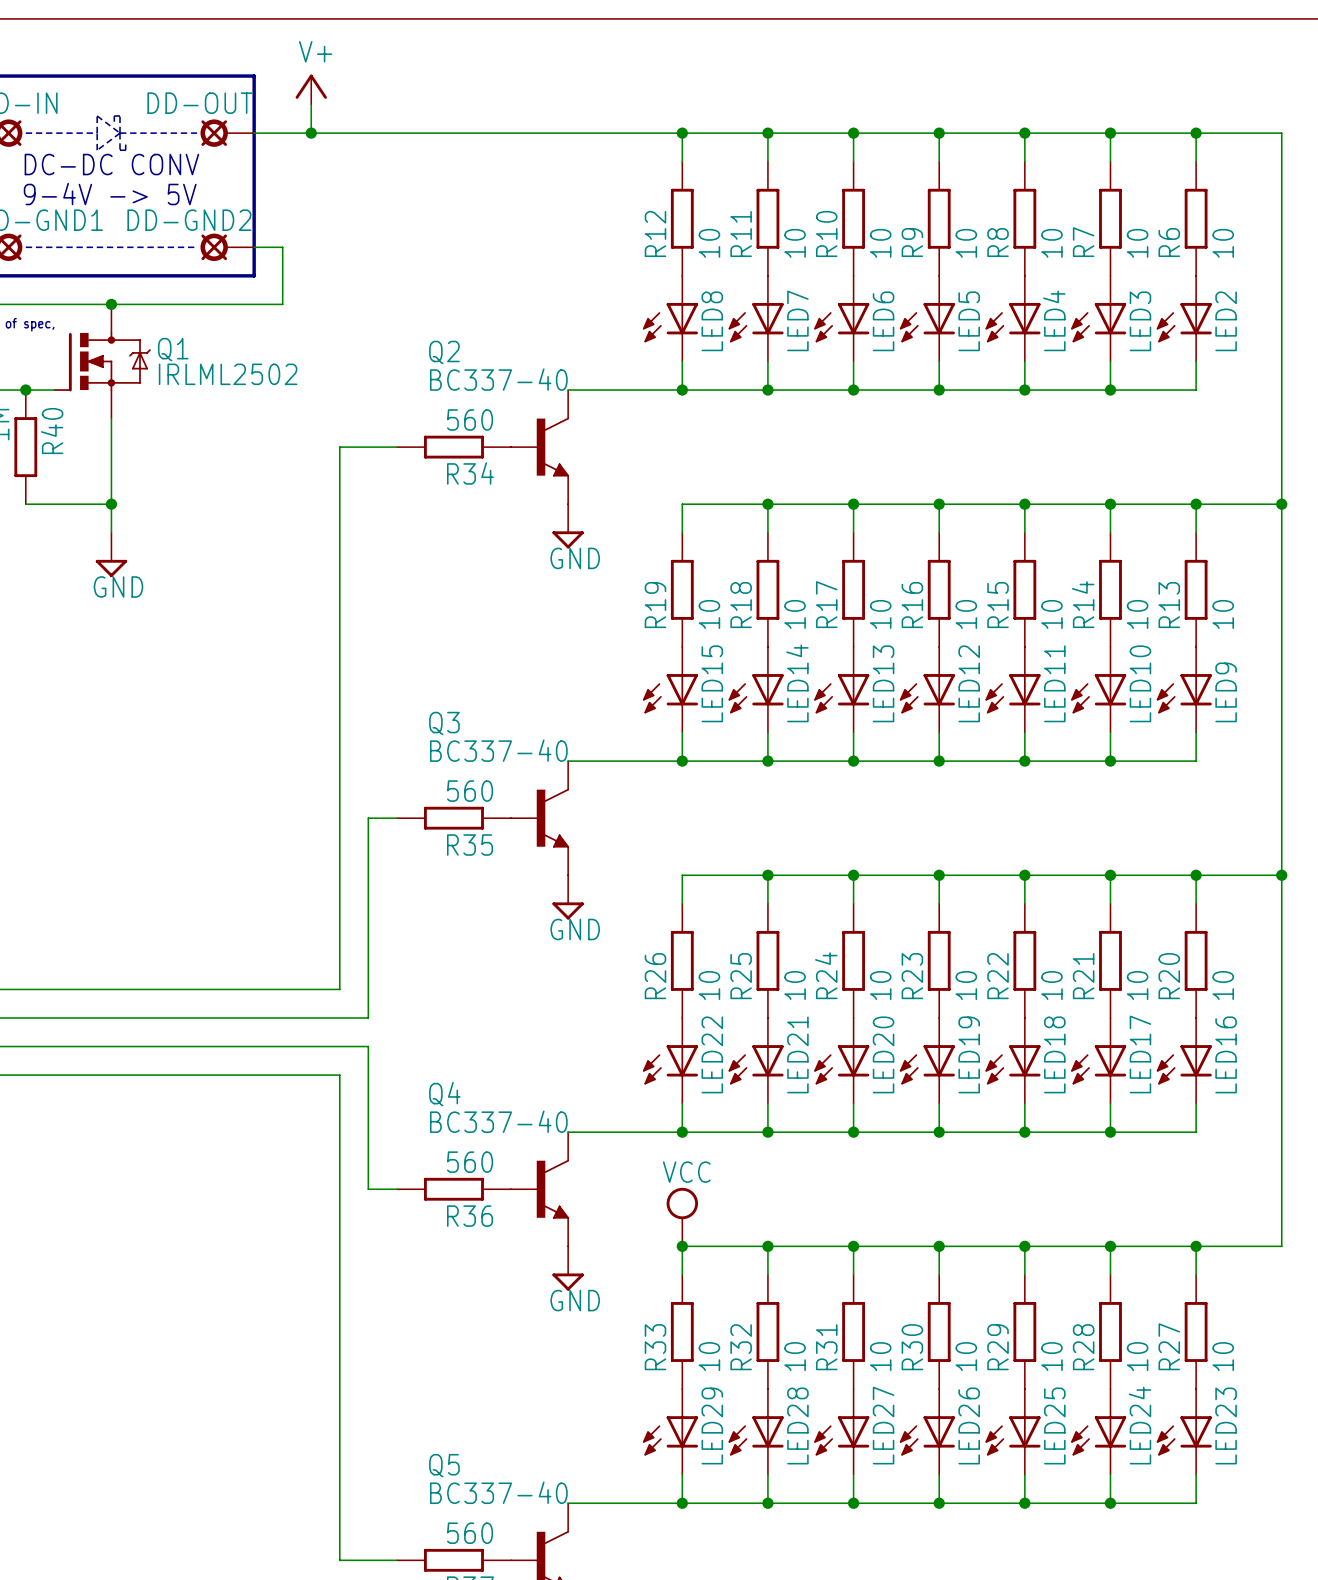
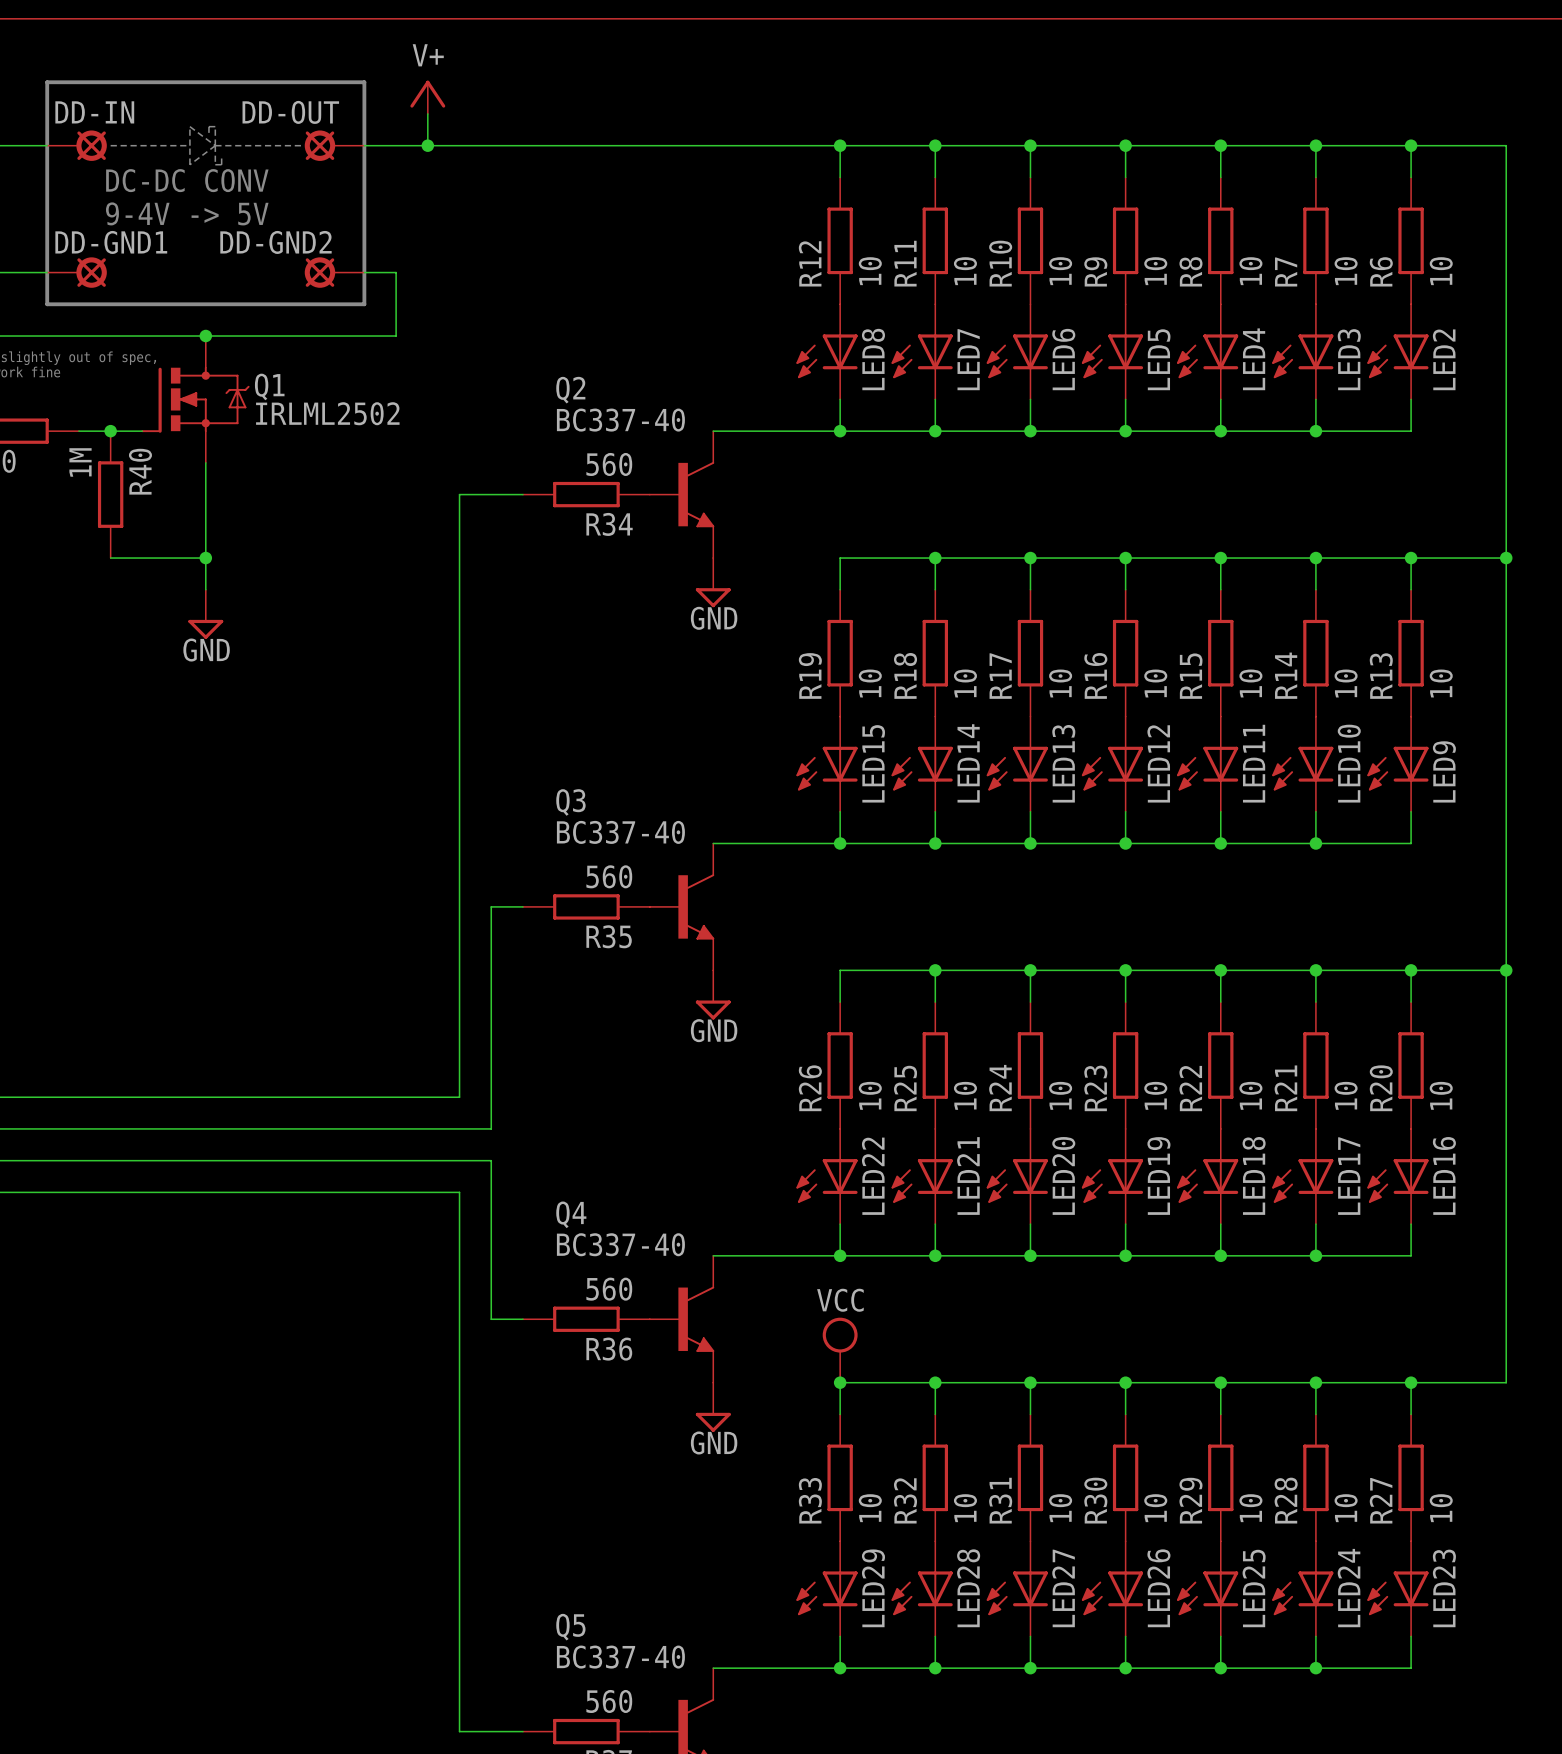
line: (25, 247) (197, 247) -> none

